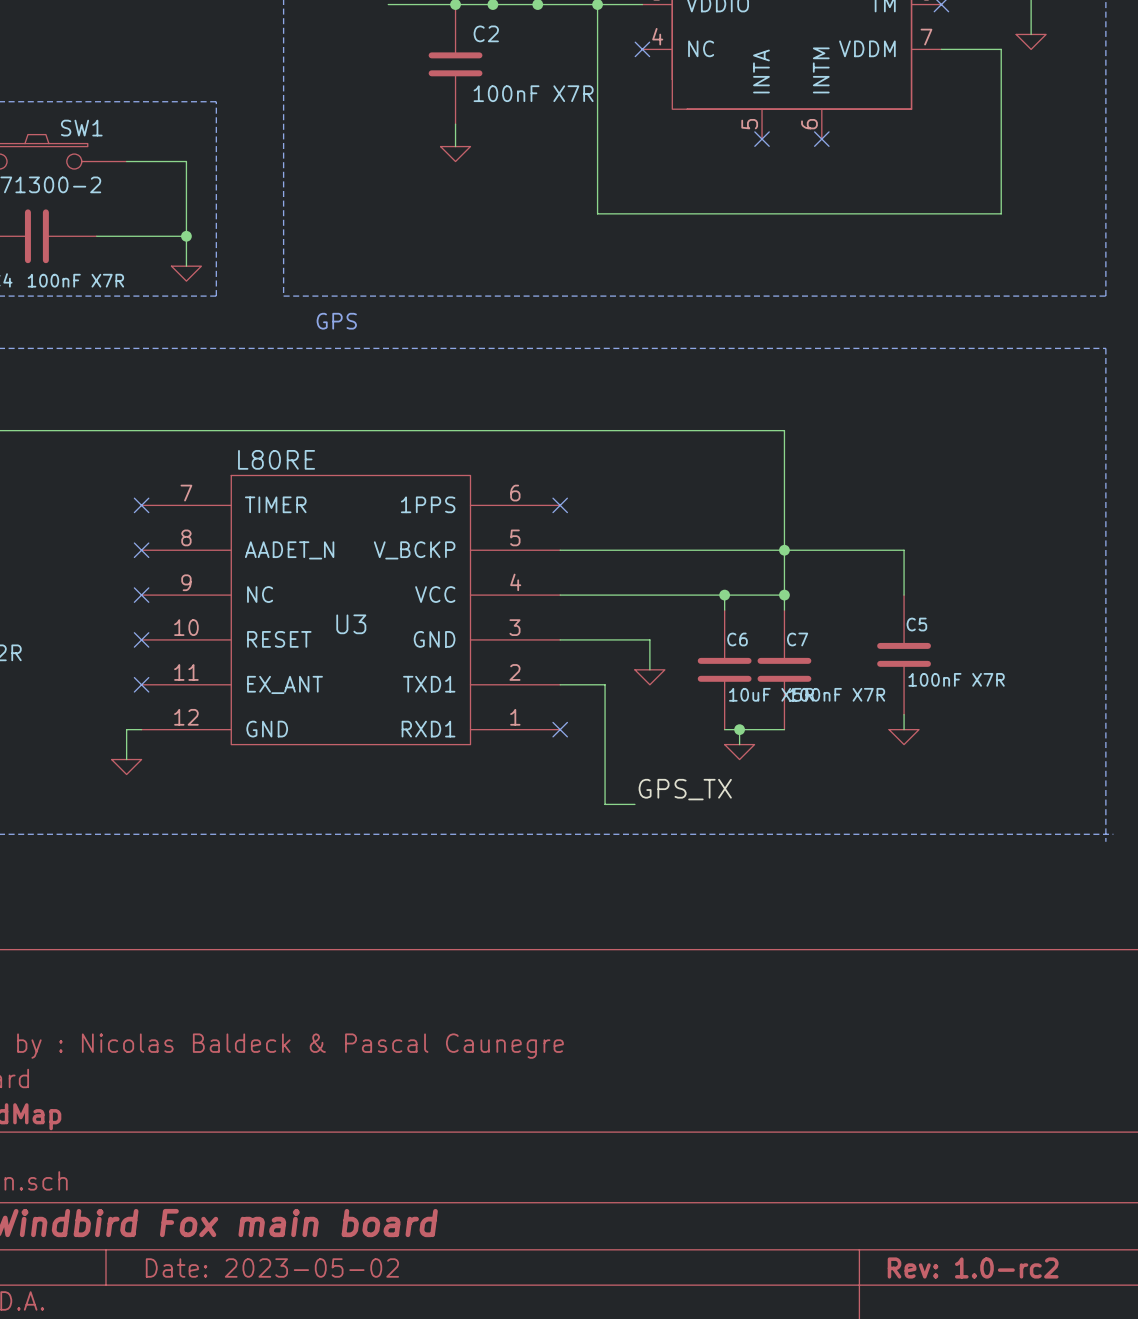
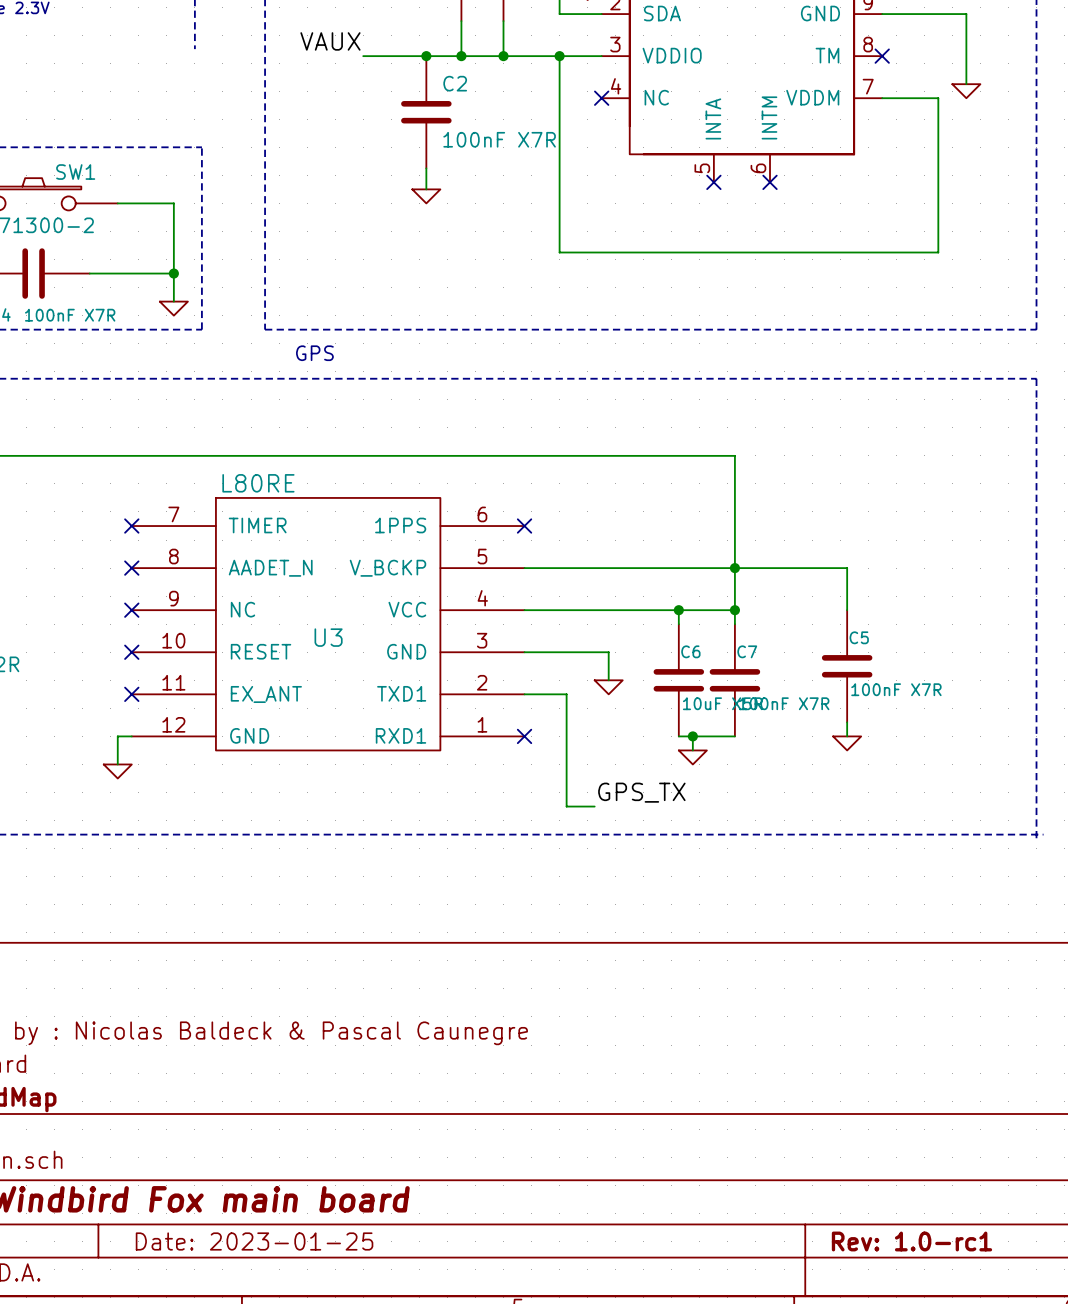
title block: Date: 2023-05-02 (272, 1267) -> Date: 2023-01-25 (254, 1241)
title block: Rev: 1.0-rc2 (973, 1267) -> Rev: 1.0-rc1 (911, 1241)

